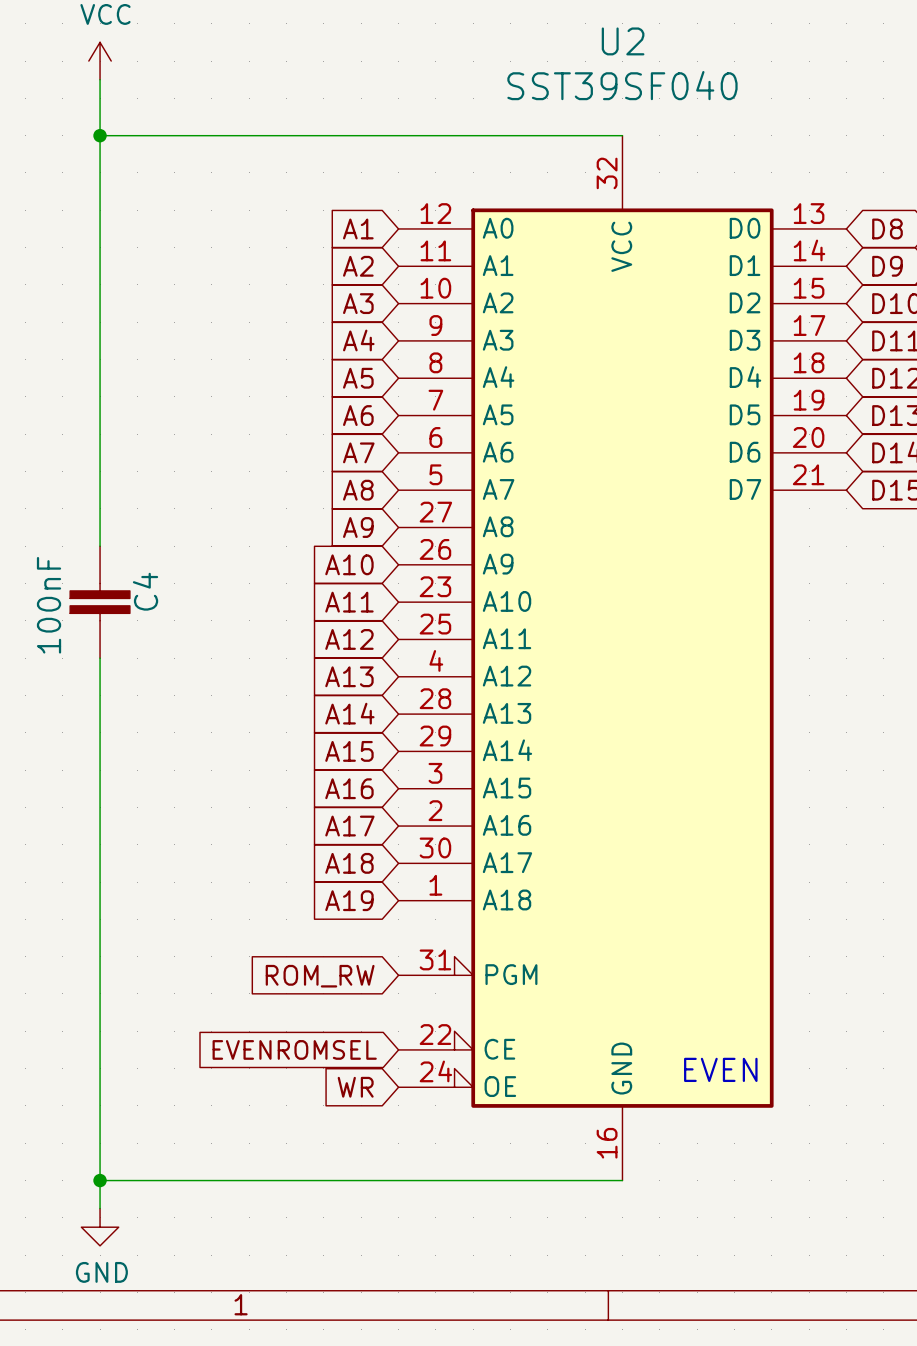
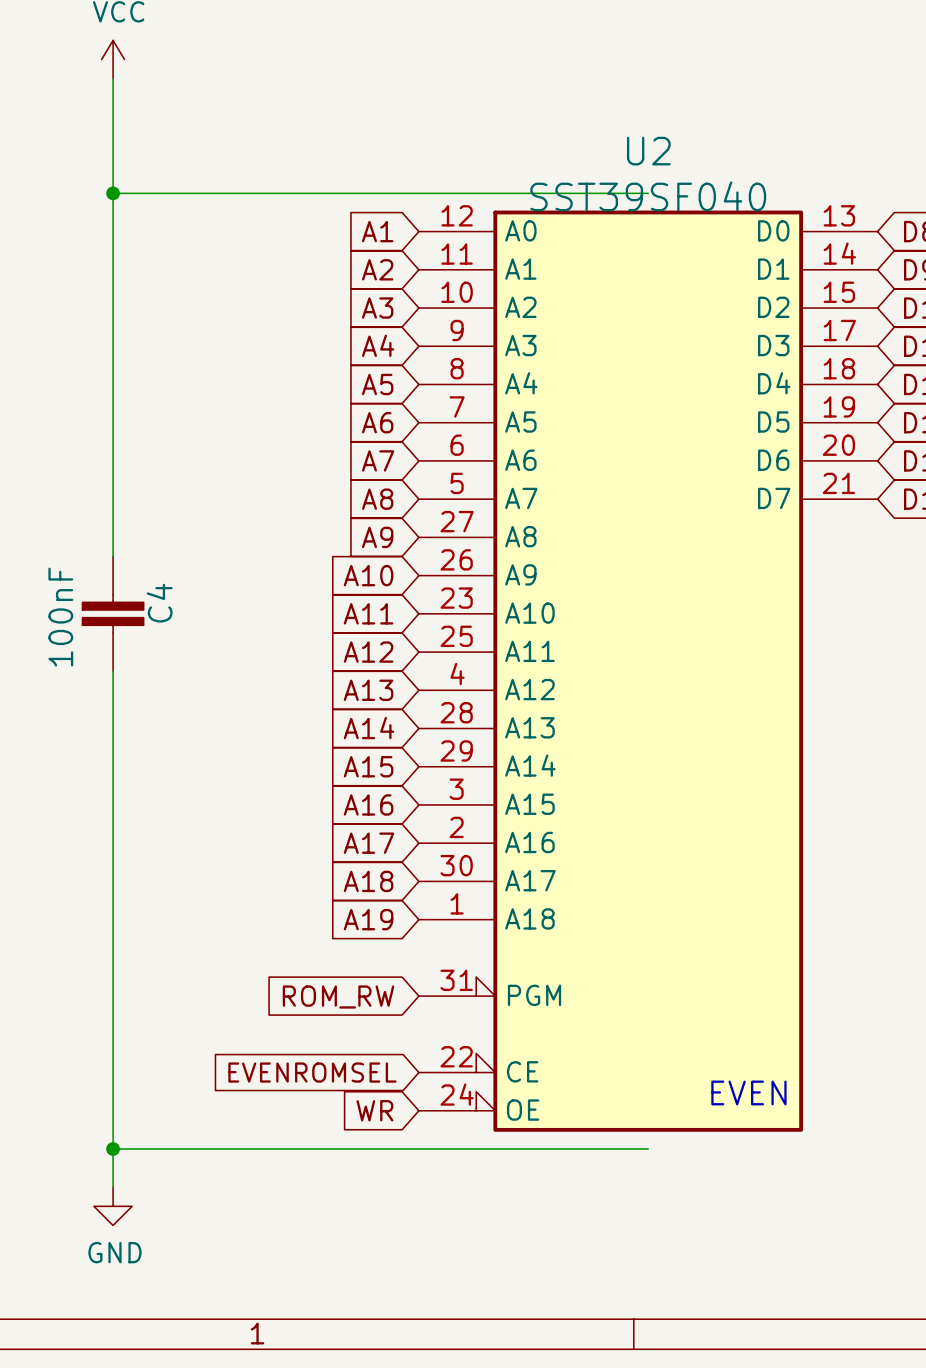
U2 name position: U2 (623, 41) -> U2 (648, 151)
U2 value position: SST39SF040 (622, 85) -> SST39SF040 (648, 196)
wire: (100, 135) (622, 135) -> (113, 193) (648, 193)
junction position: (100, 135) -> (113, 193)
U2 symbol: [398, 135, 847, 1181] -> [418, 210, 878, 1132]
wire: (100, 1161) (100, 1208) -> none
wire: (100, 1180) (622, 1180) -> (113, 1148) (648, 1148)
junction position: (100, 1180) -> (113, 1148)
power symbol position: GND (100, 1227) -> GND (113, 1206)

